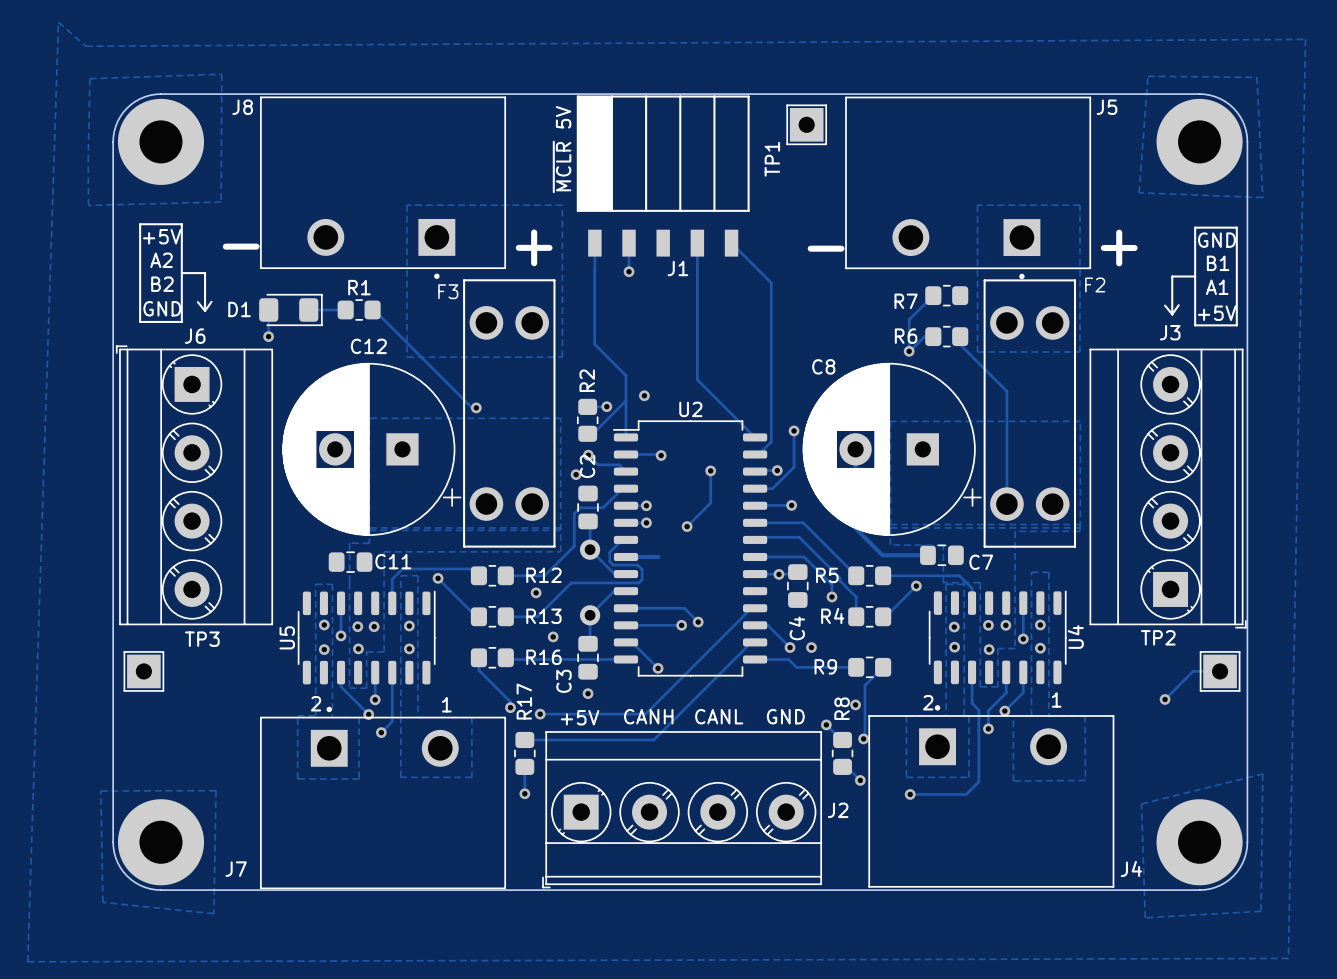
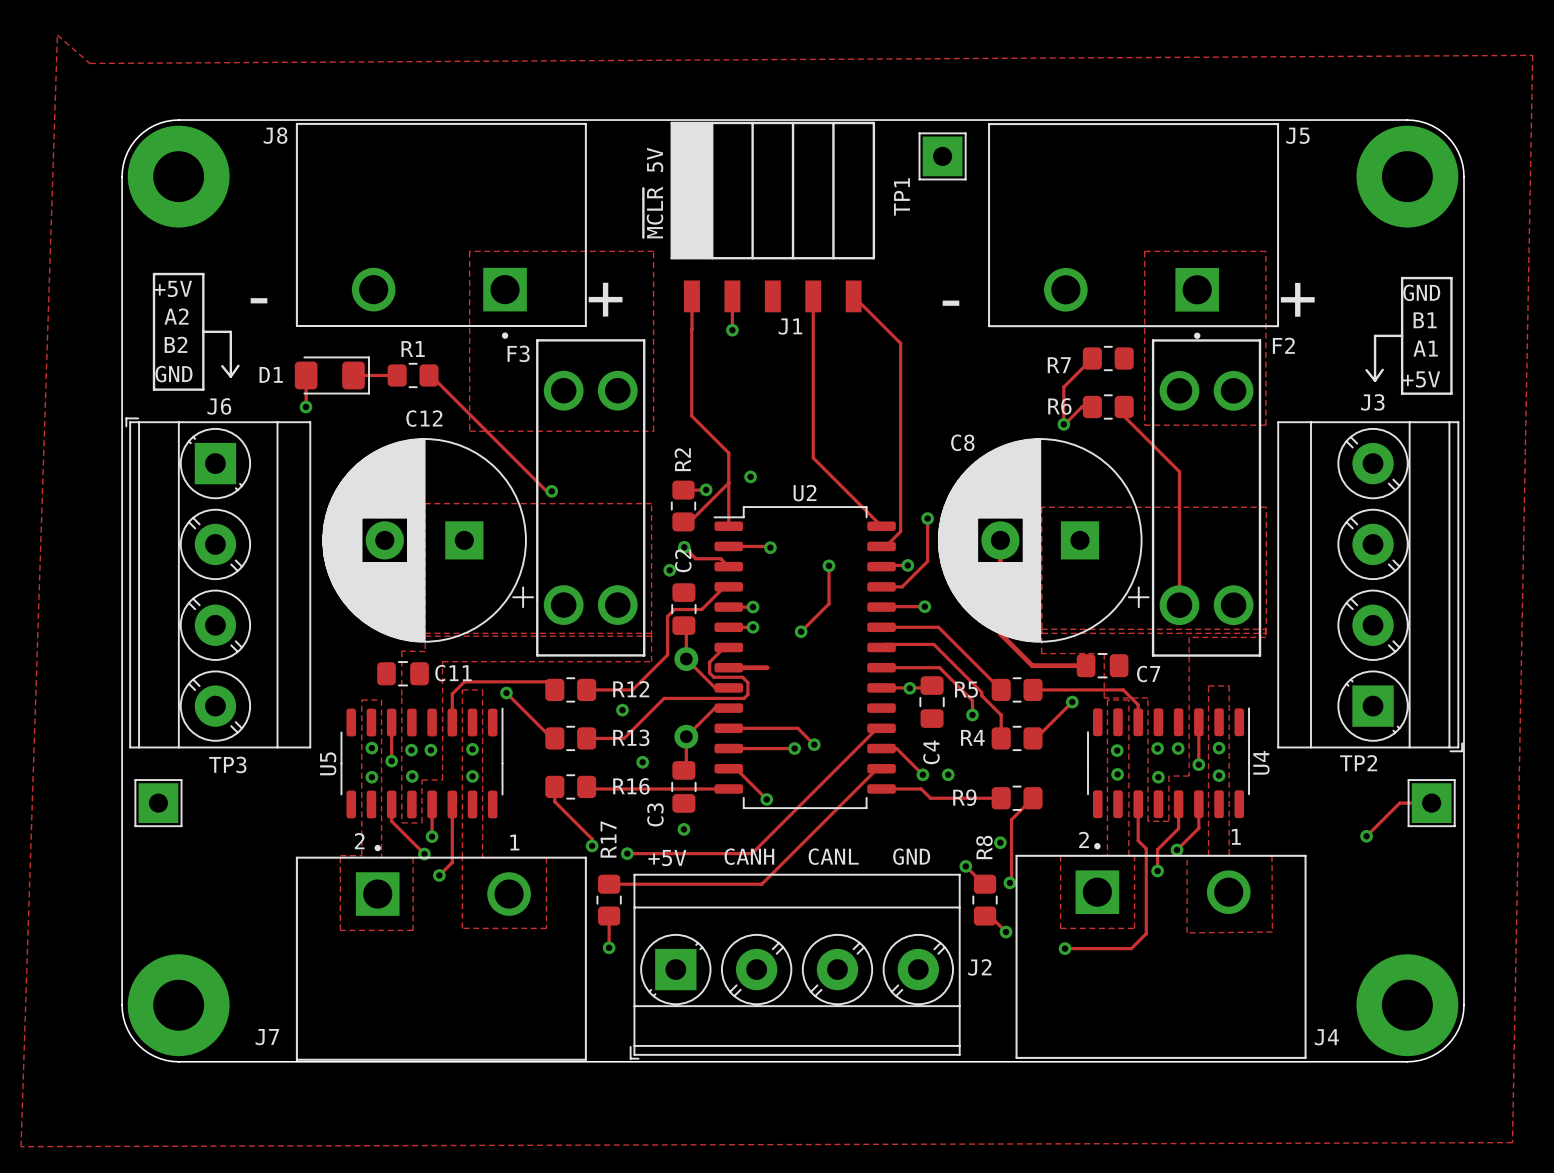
zone outline: (221, 74) (89, 78) (88, 205) (221, 202) (221, 74) -> none
zone outline: (1147, 76) (1256, 77) (1262, 197) (1139, 192) (1147, 76) -> none
zone outline: (1262, 773) (1141, 804) (1145, 917) (1261, 911) (1262, 773) -> none
zone outline: (215, 790) (100, 791) (102, 902) (213, 913) (215, 790) -> none

